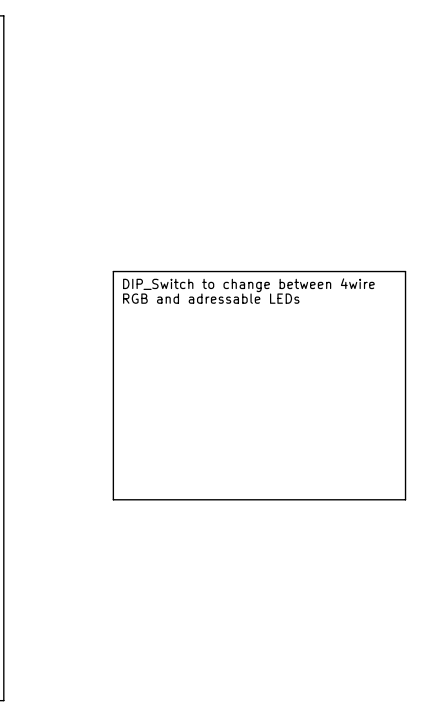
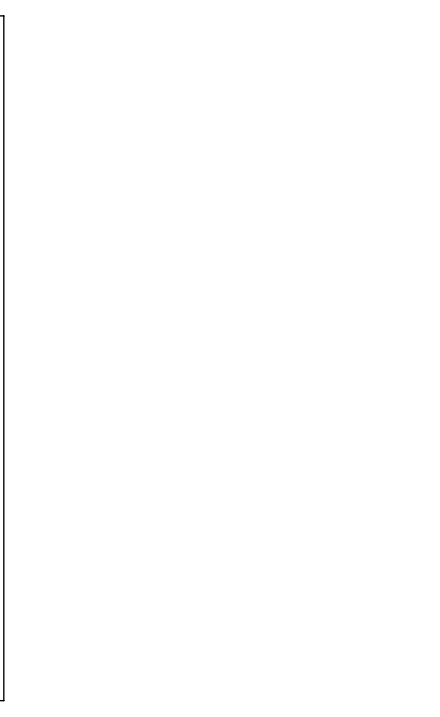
line: (113, 271) (405, 271) (405, 499) (113, 499) (113, 271) -> none
text: DIP_Switch to change between 4wire (248, 285) -> none
text: RGB and adressable LEDs (211, 298) -> none

